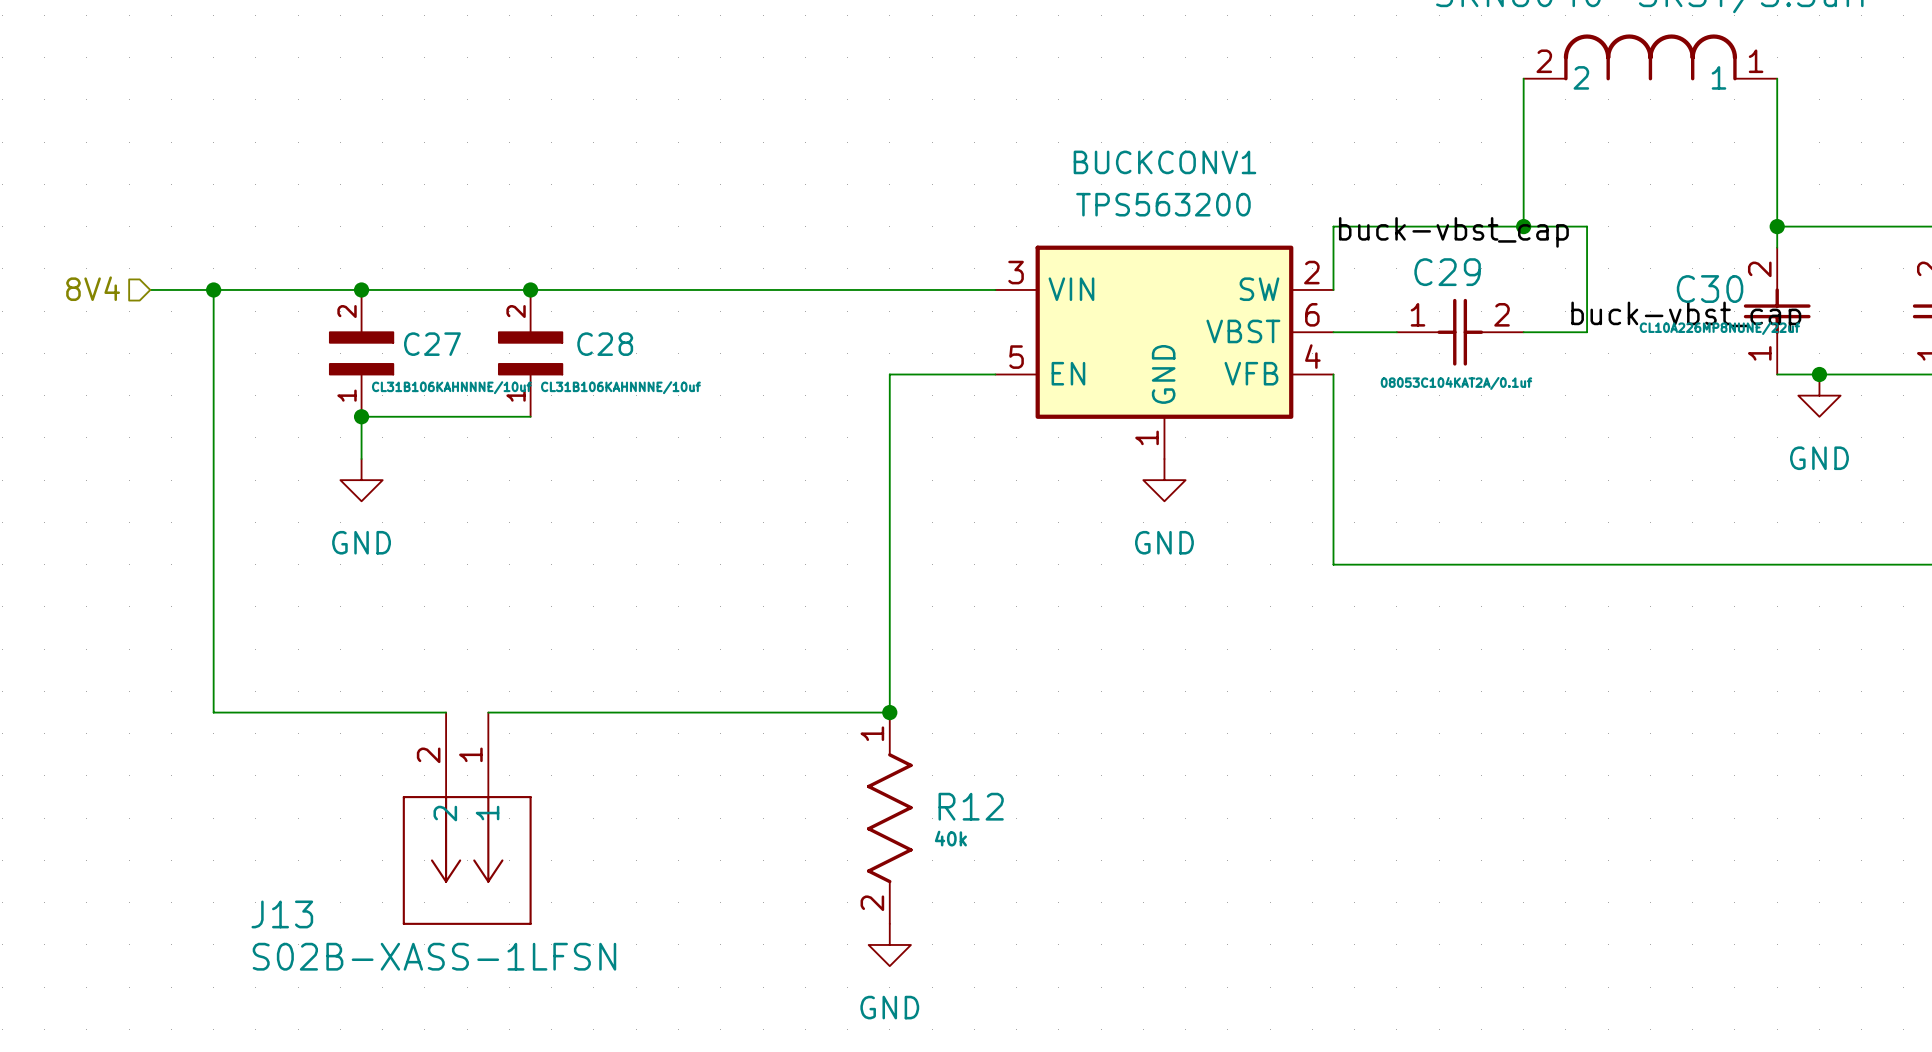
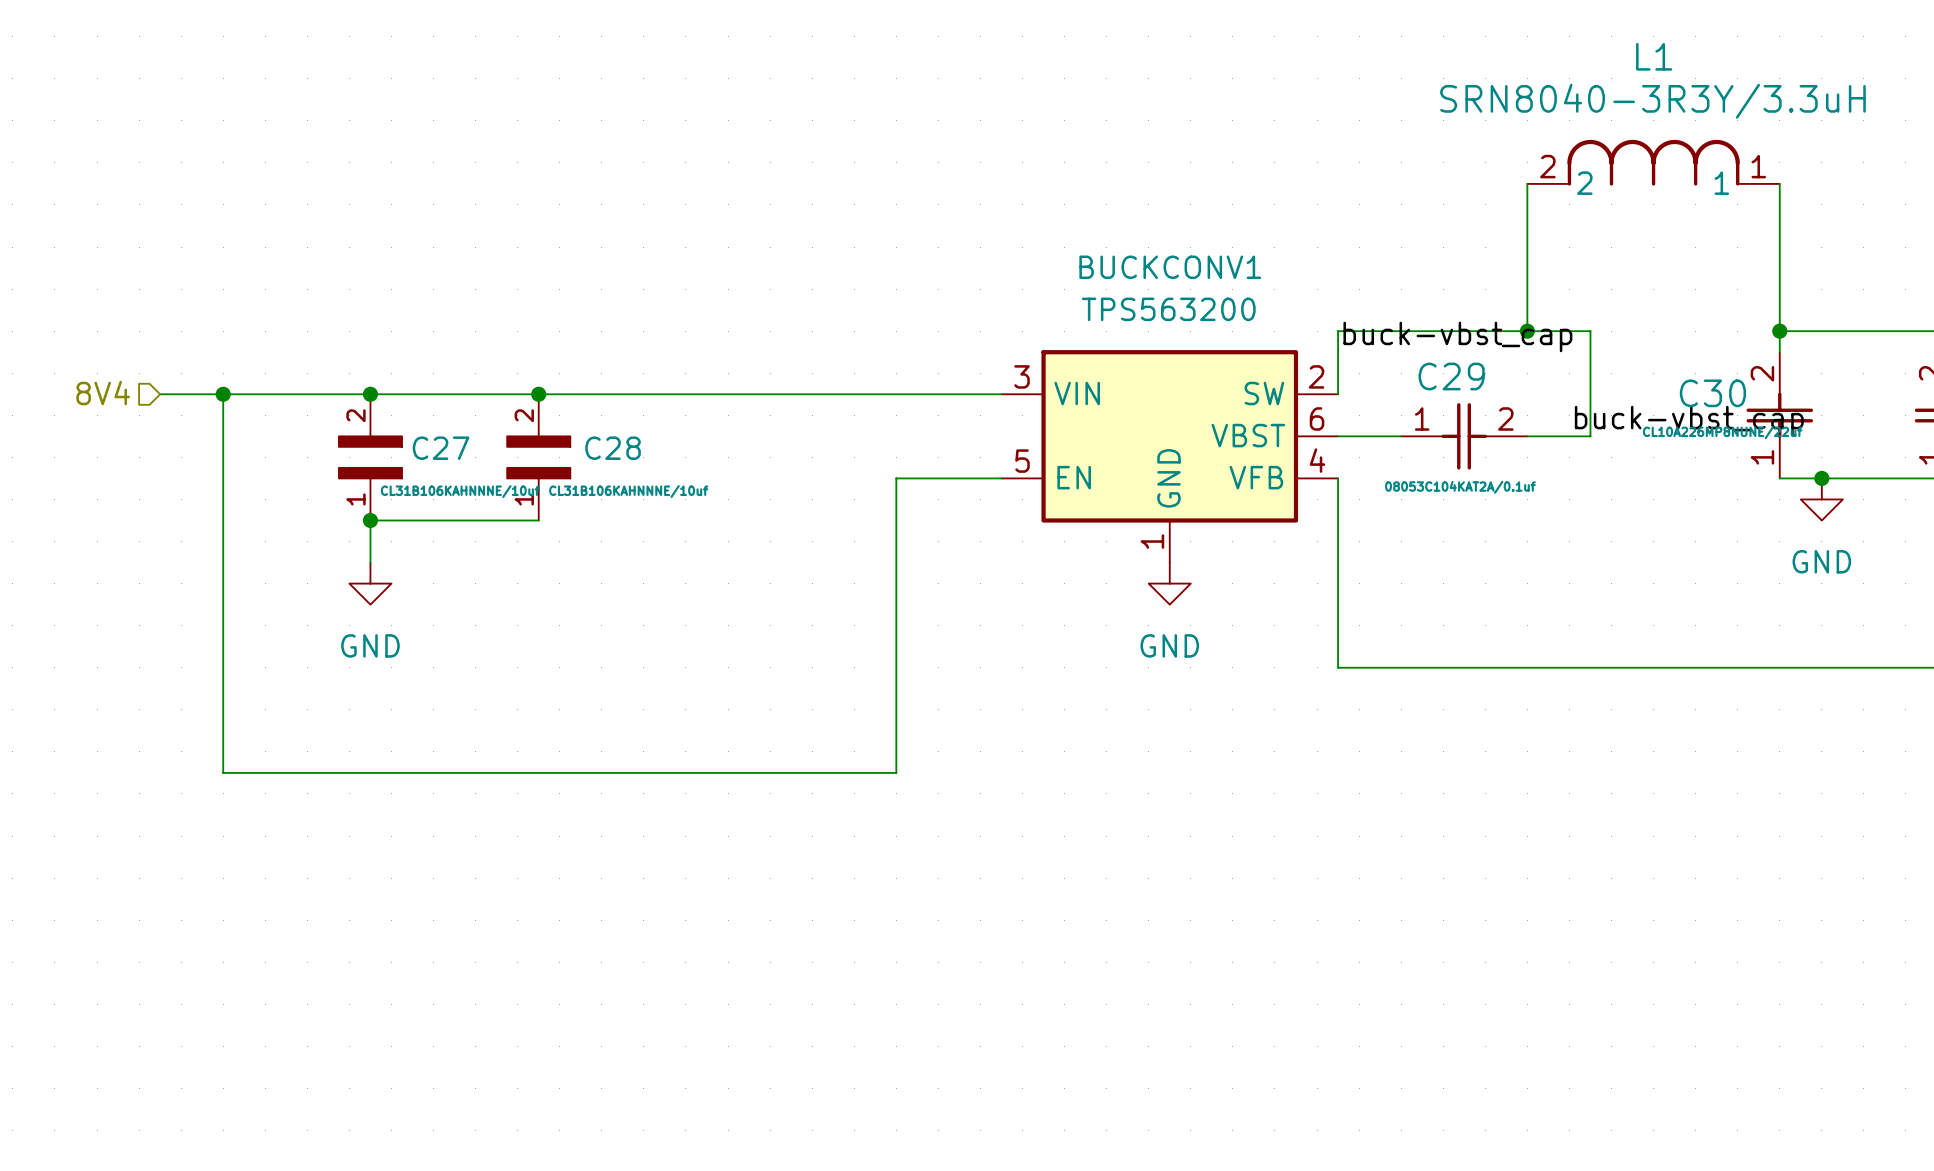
wire: (213, 670) (213, 712) (446, 712) -> none
wire: (889, 670) (889, 712) (488, 712) -> (896, 772) (223, 772)
junction: (889, 712) -> none
J13: S02B-XASS-1LFSN (467, 818) -> none
R12: 40k (889, 818) -> none
power symbol: GND (889, 944) -> none

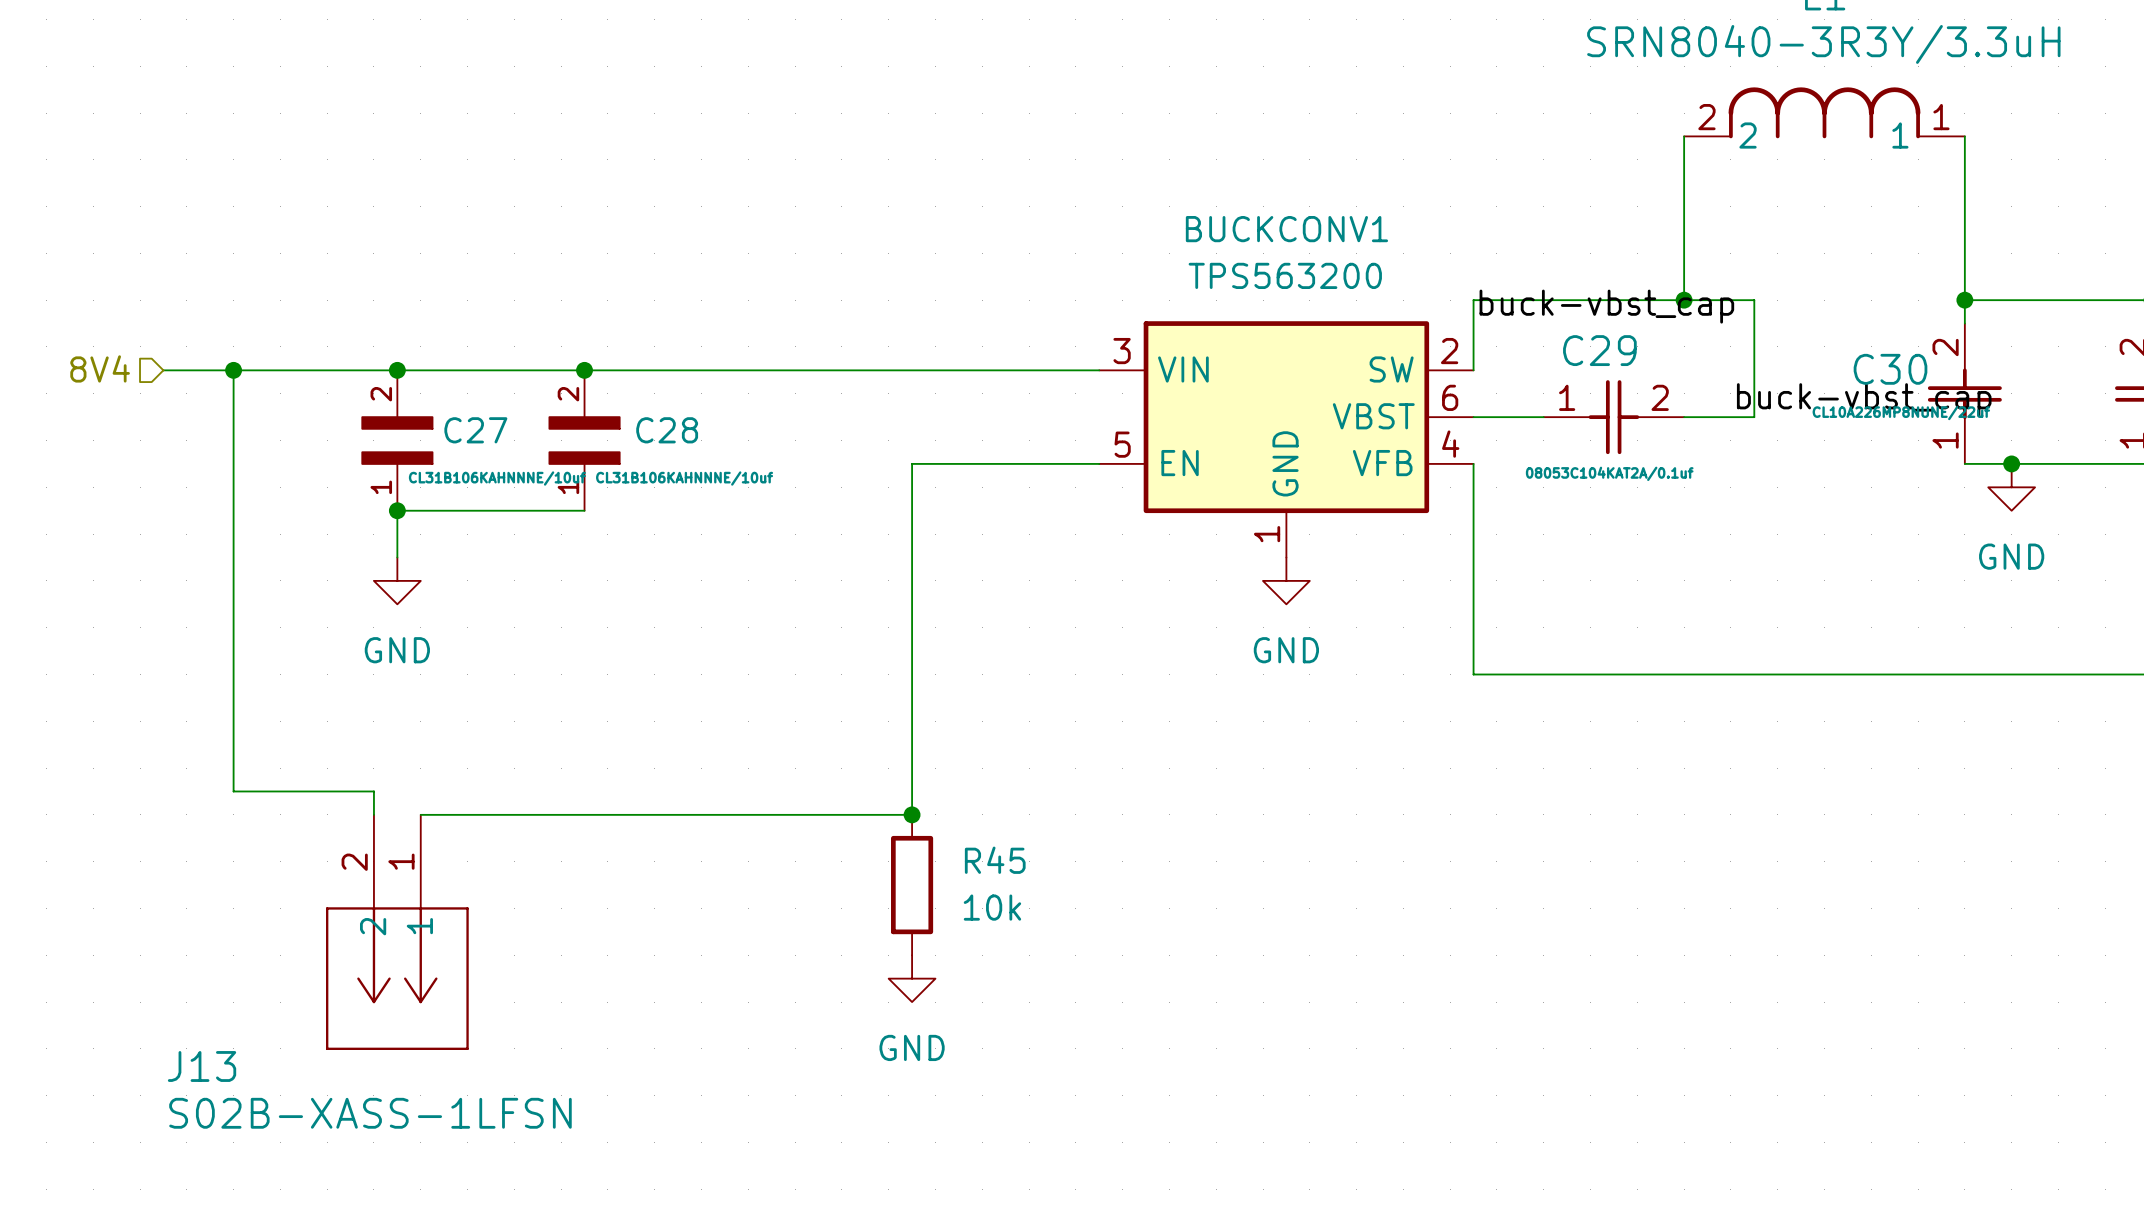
wire: (896, 478) (896, 772) (349, 772) -> (982, 463) (912, 463) (912, 814) (420, 814)
wire: none -> (373, 791) (373, 814)
junction: none -> (912, 814)
R45: none -> 10k (912, 885)
J13: none -> S02B-XASS-1LFSN (397, 932)
power symbol: none -> GND (912, 978)

